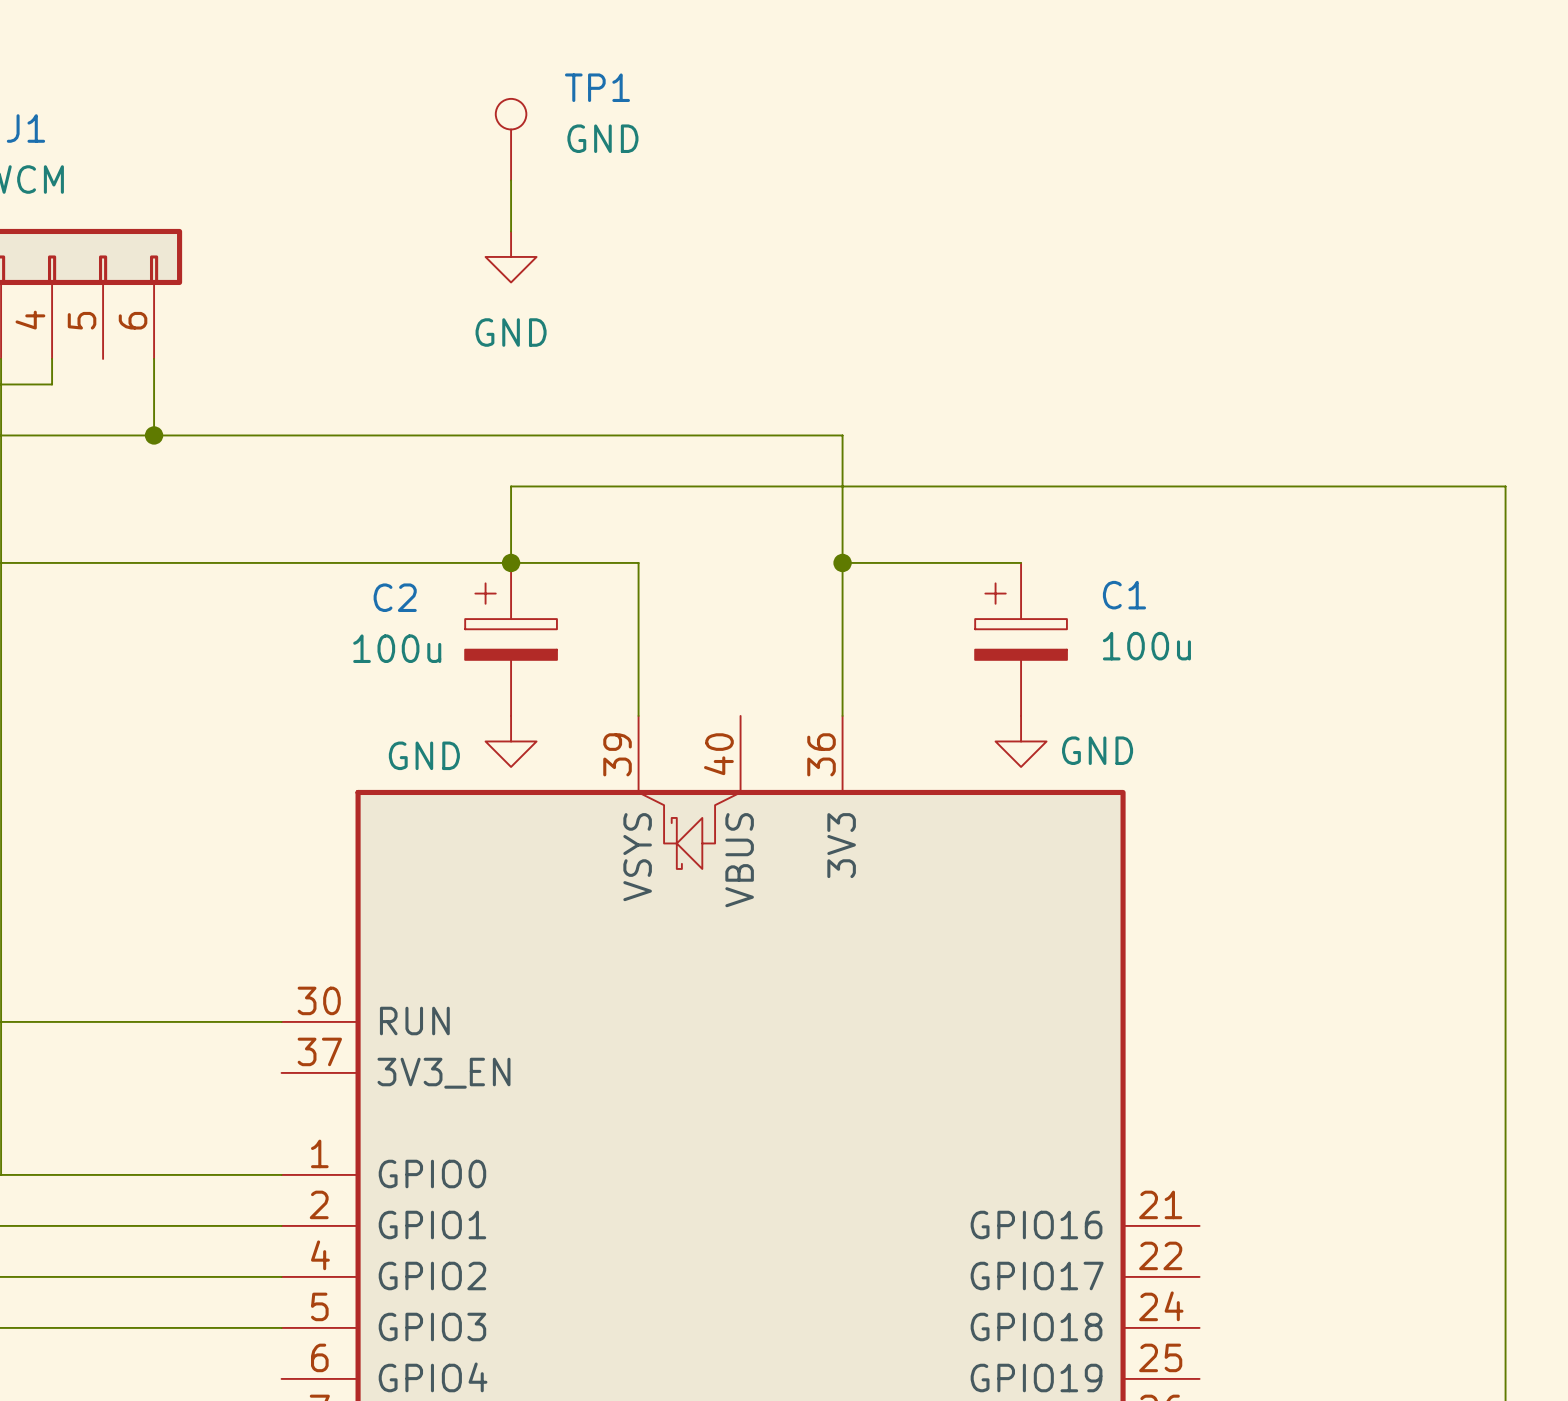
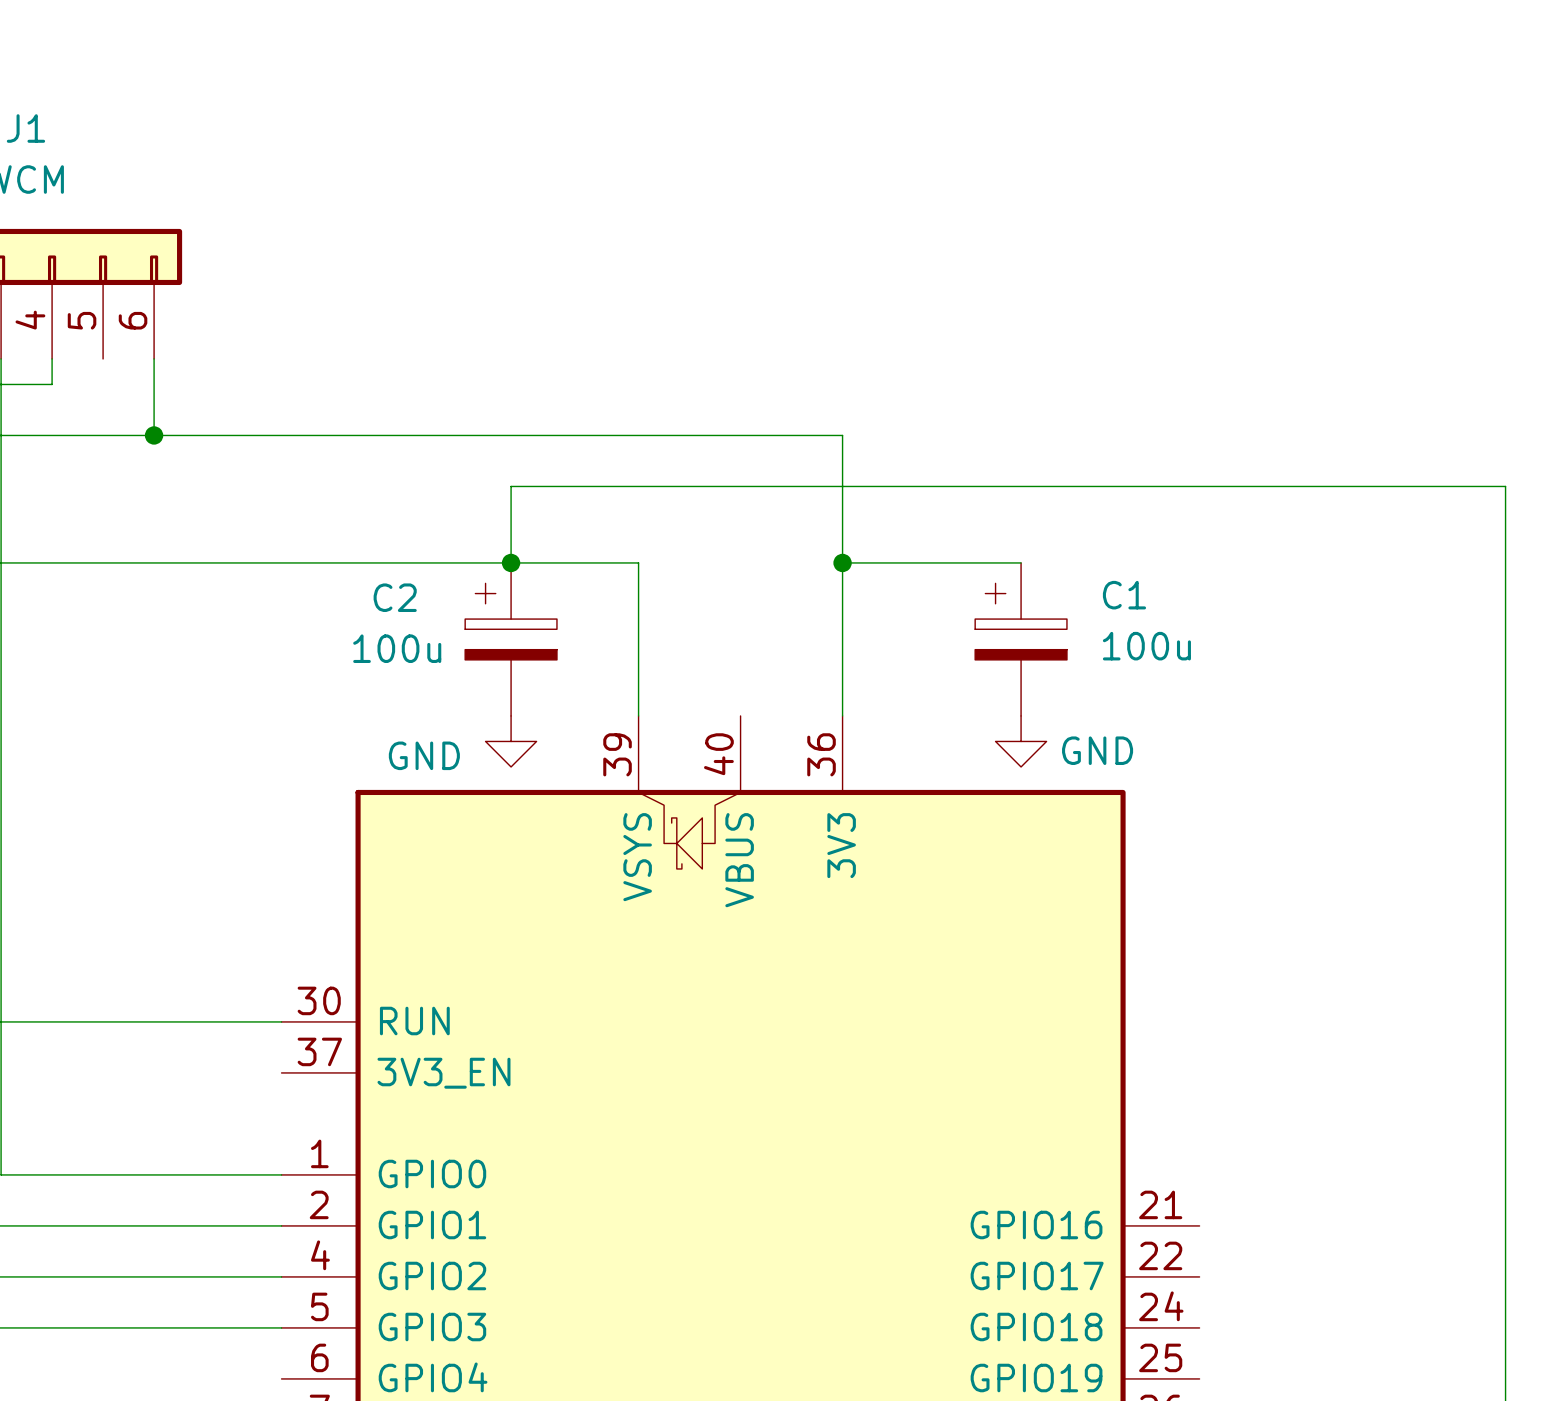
TP1: GND (511, 139) -> none
wire: (511, 180) (511, 231) -> none
power symbol: GND (511, 256) -> none

